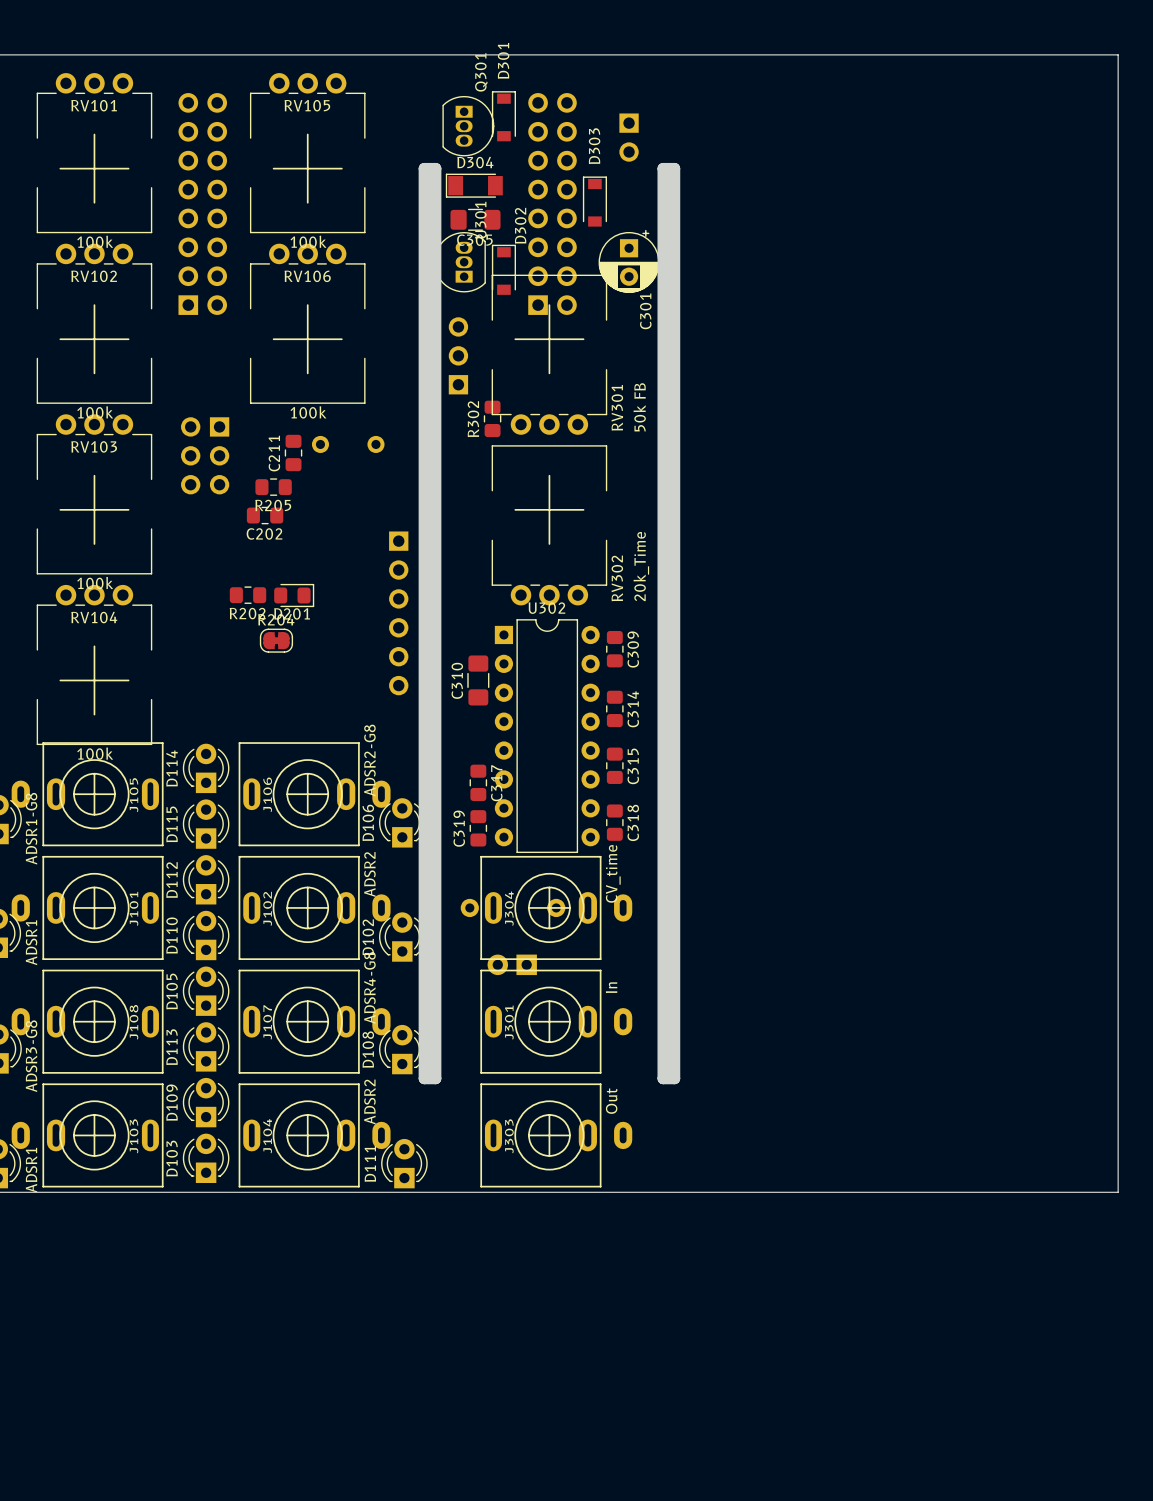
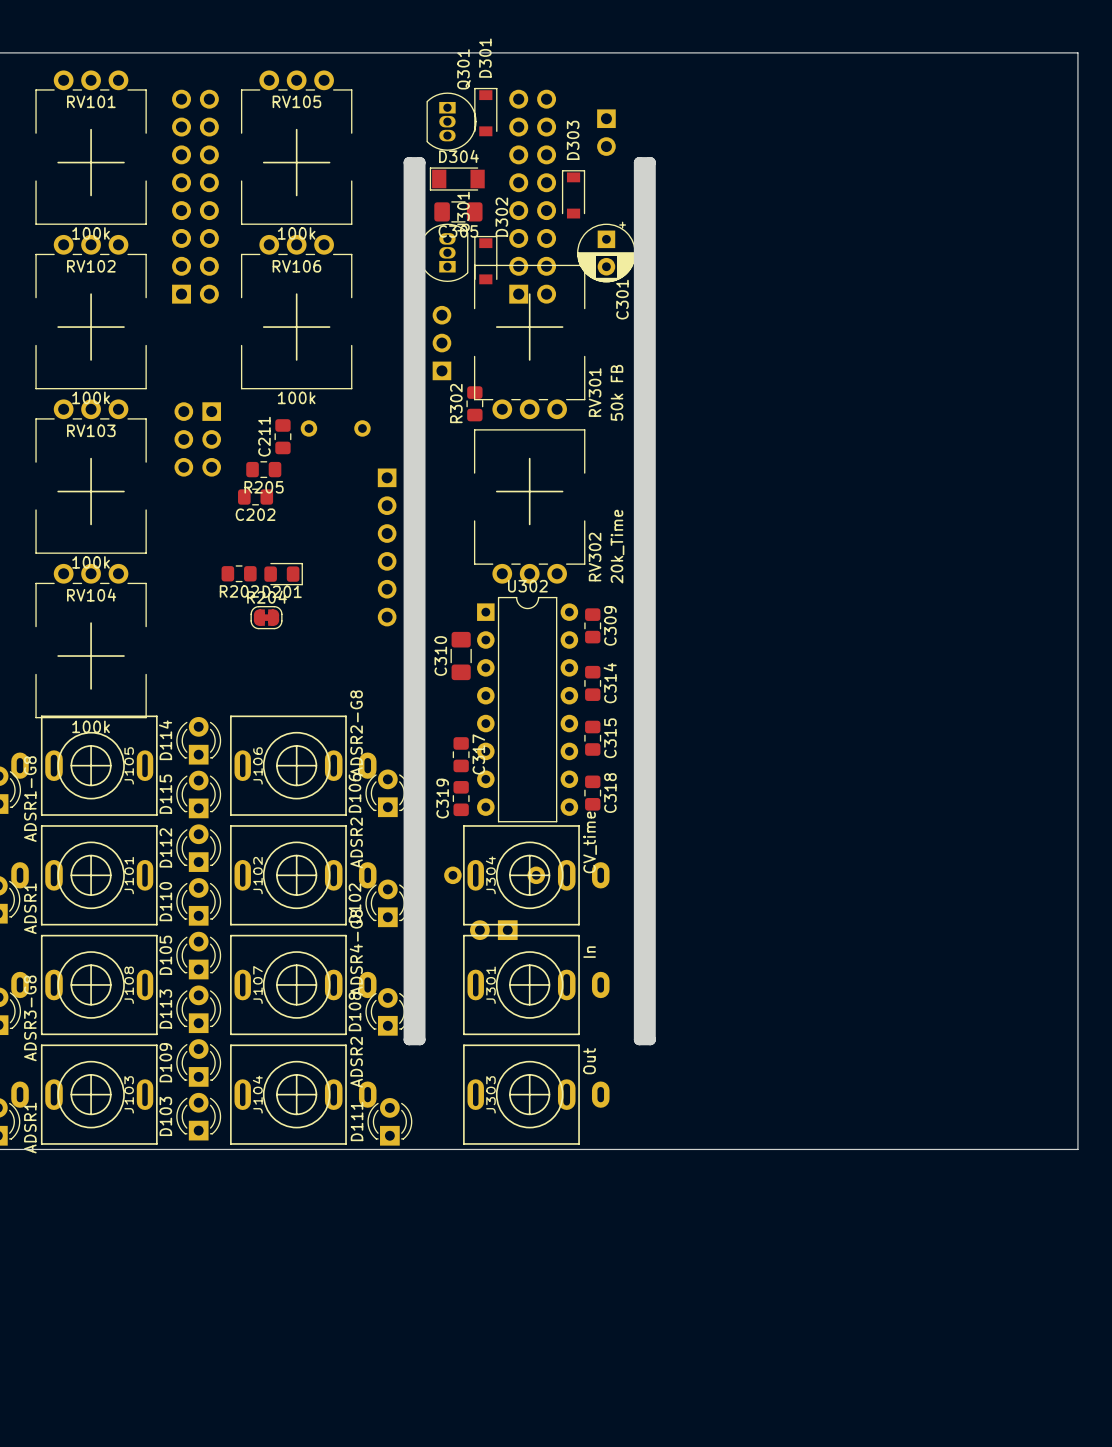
part position: (398, 613) -> (387, 547)

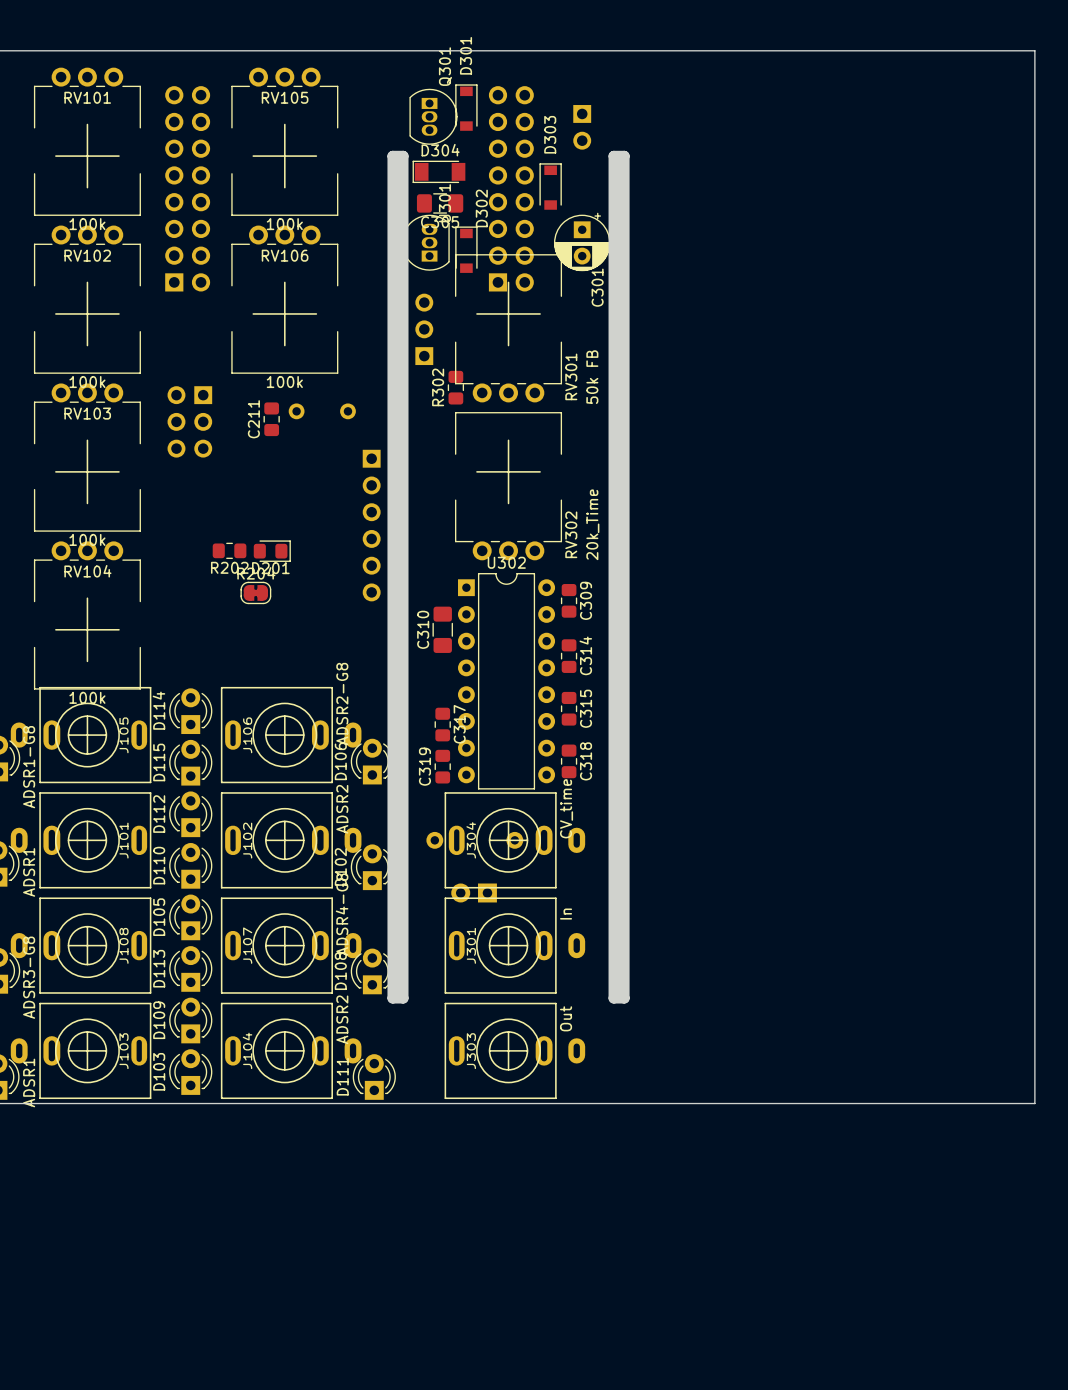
R205: (263, 469) -> none
C202: (255, 497) -> none

